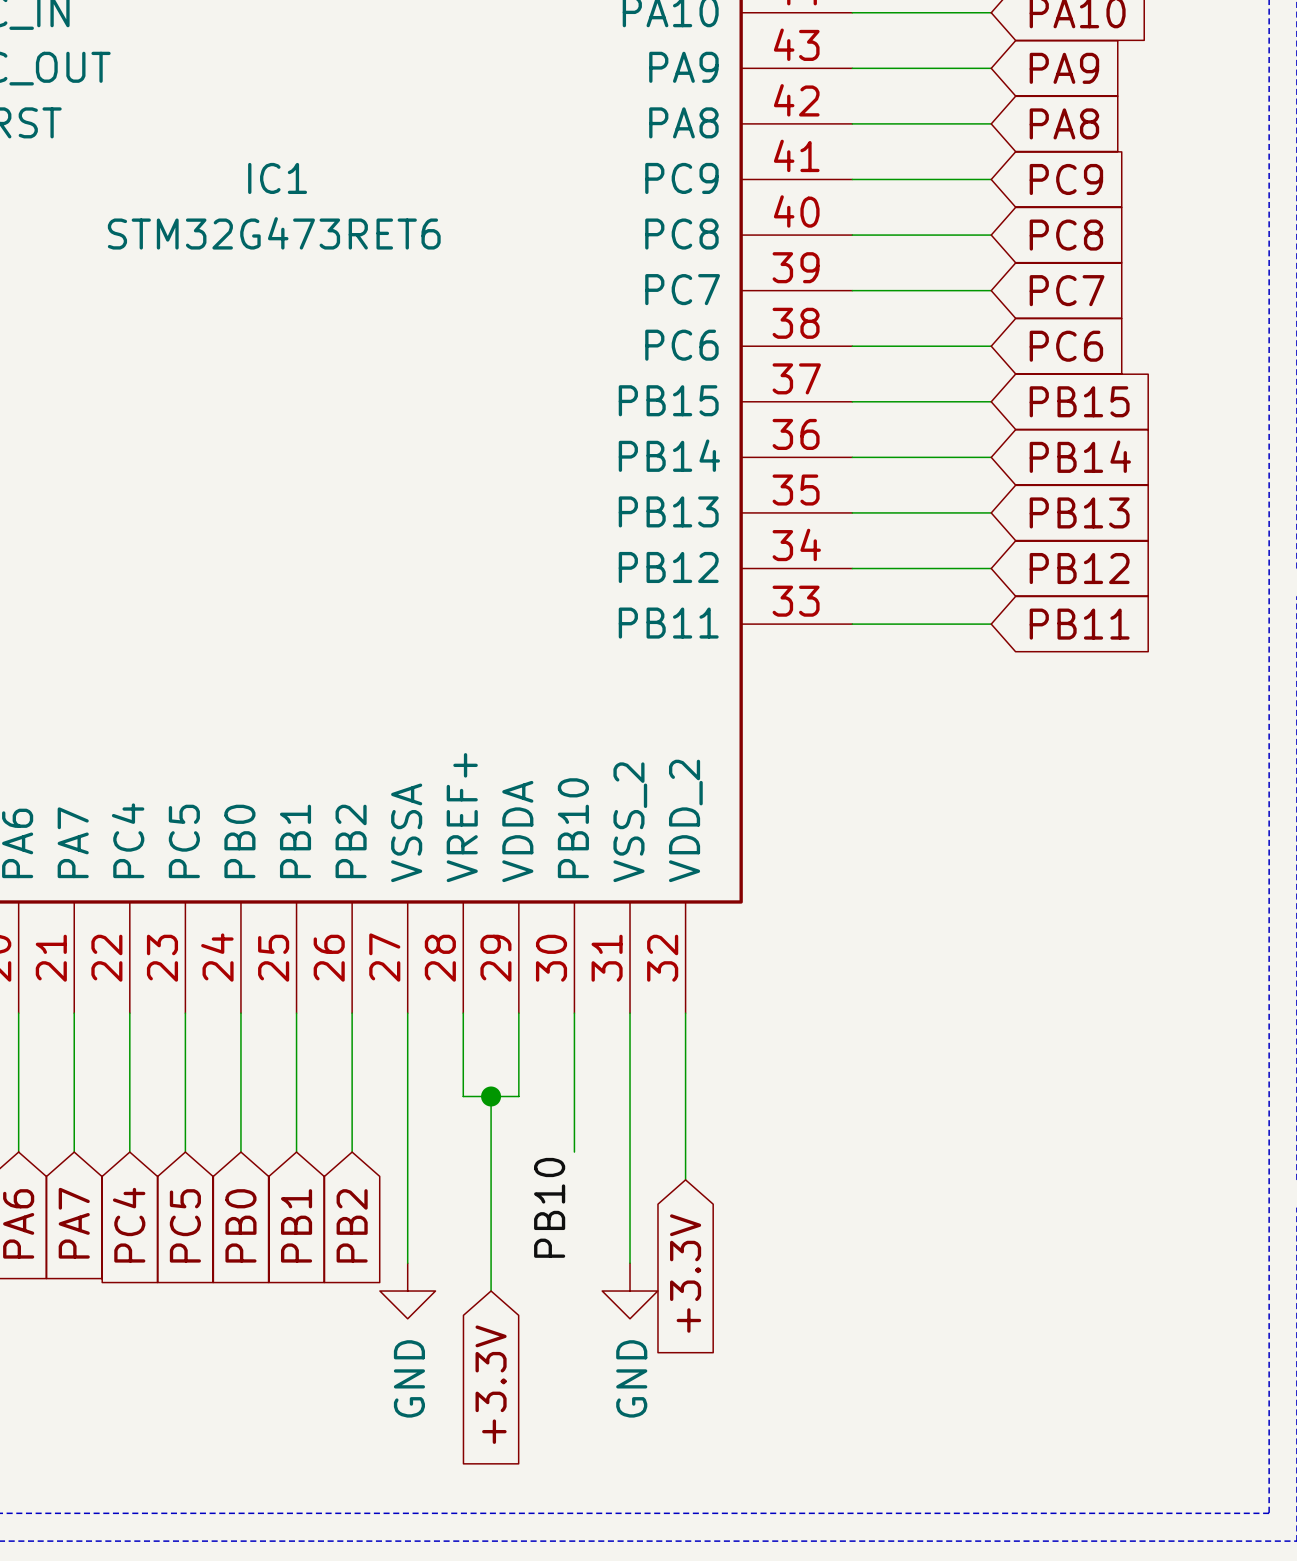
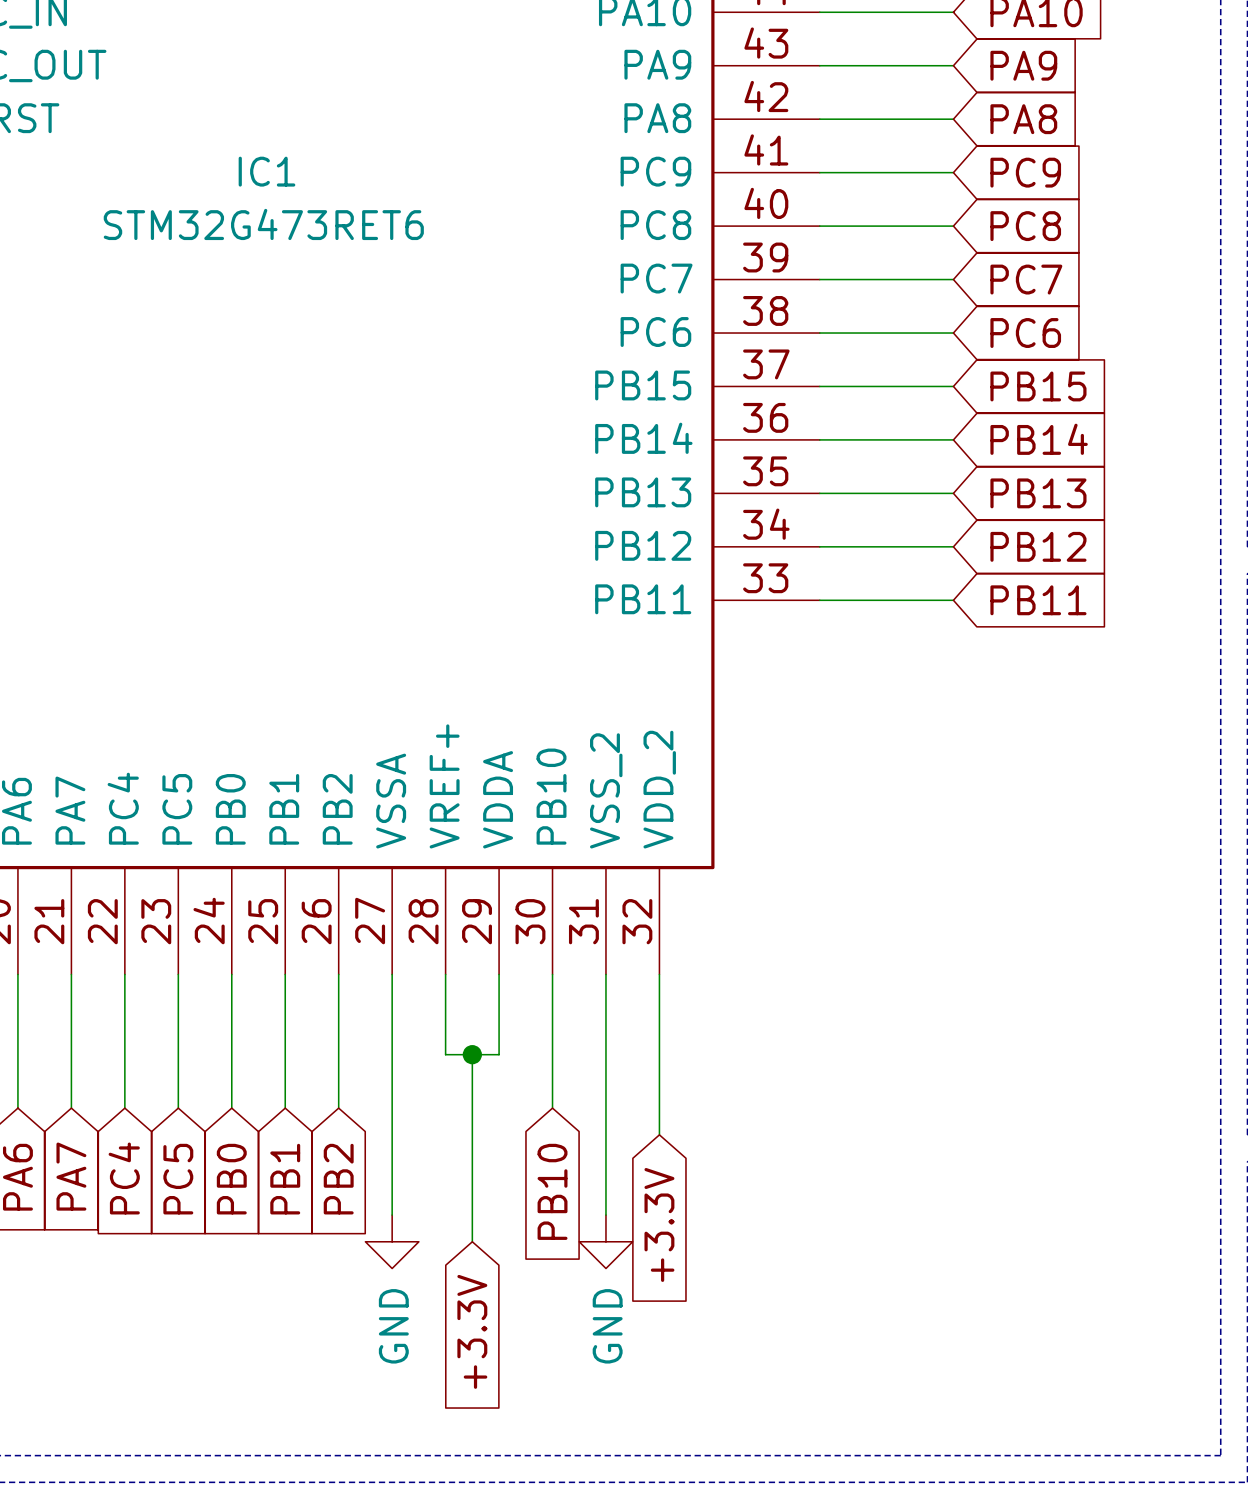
label: PB10 (549, 1207) -> none
global label: none -> PB10 (552, 1191)

